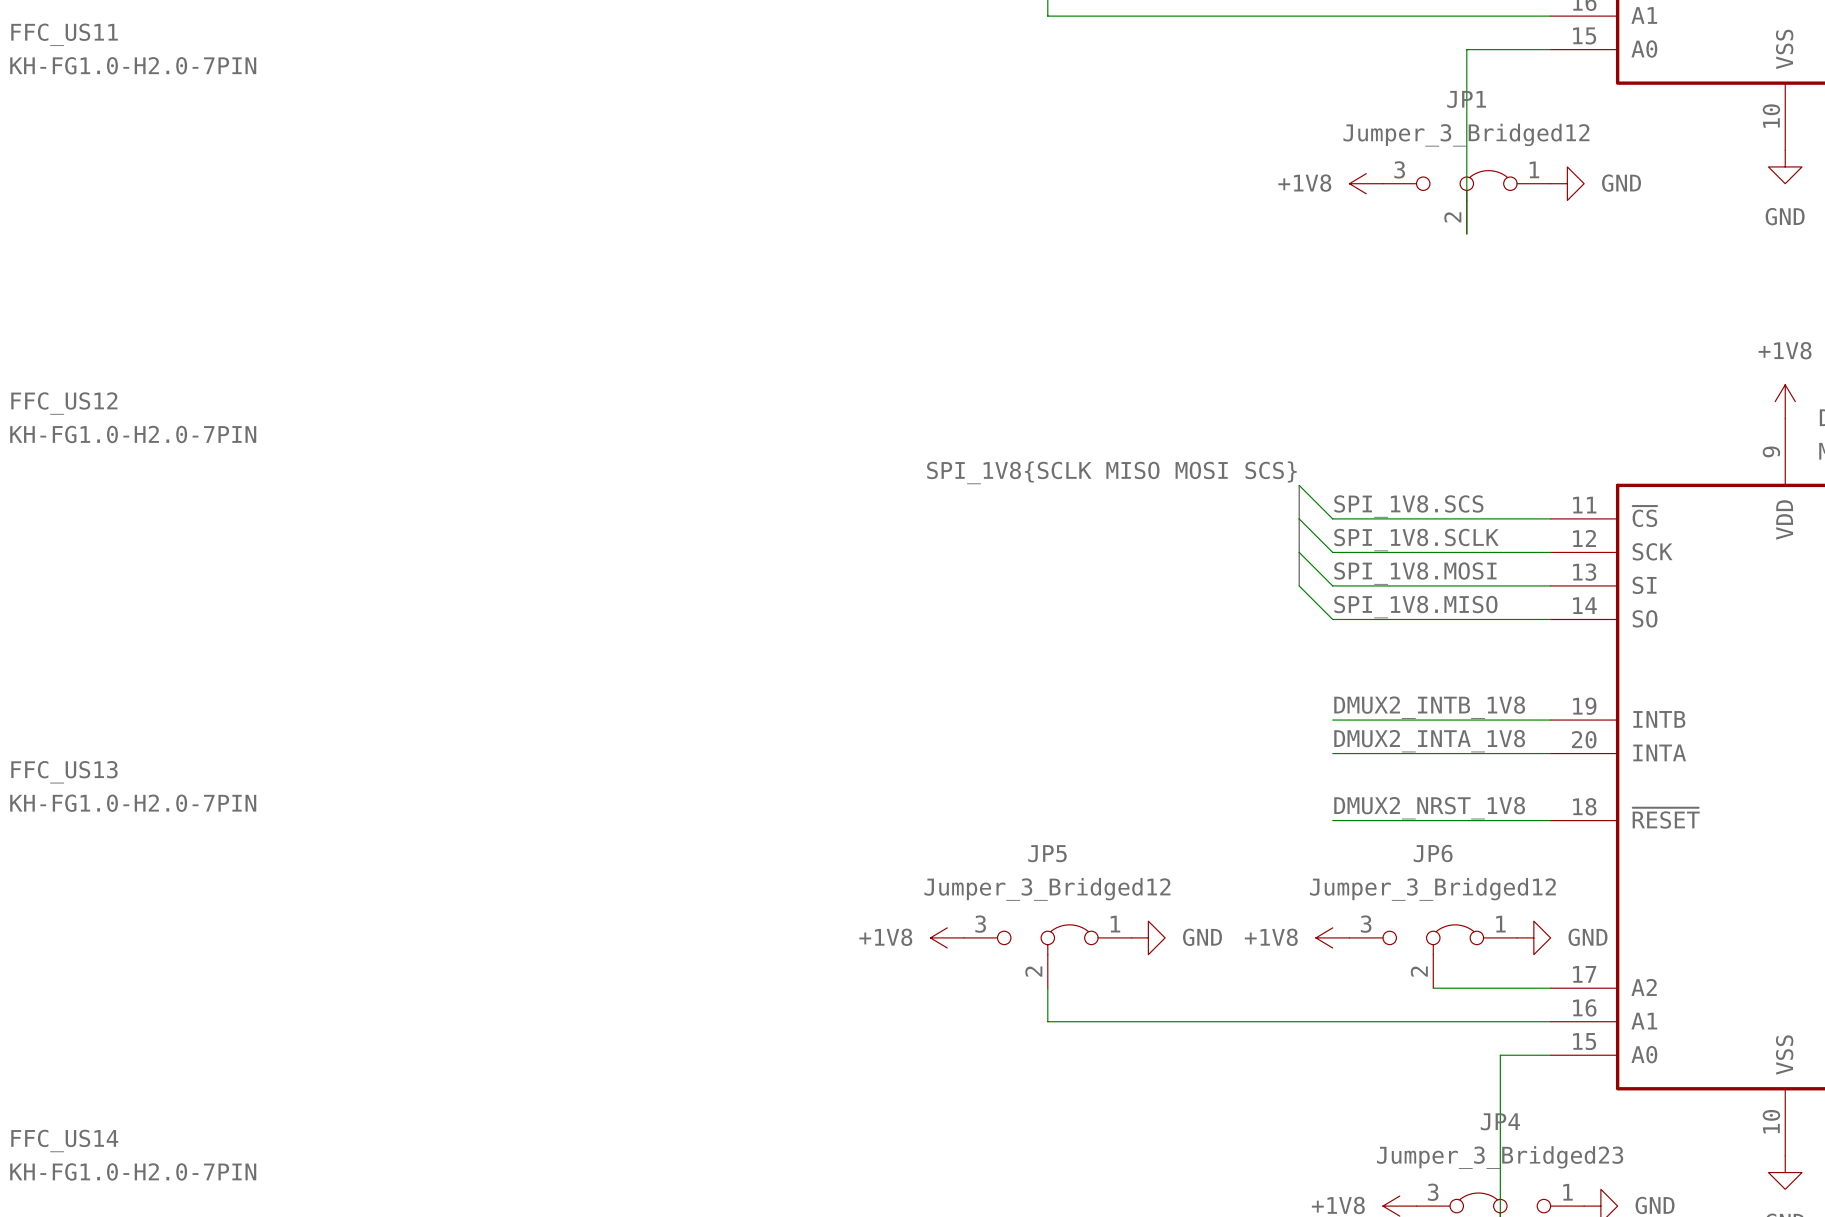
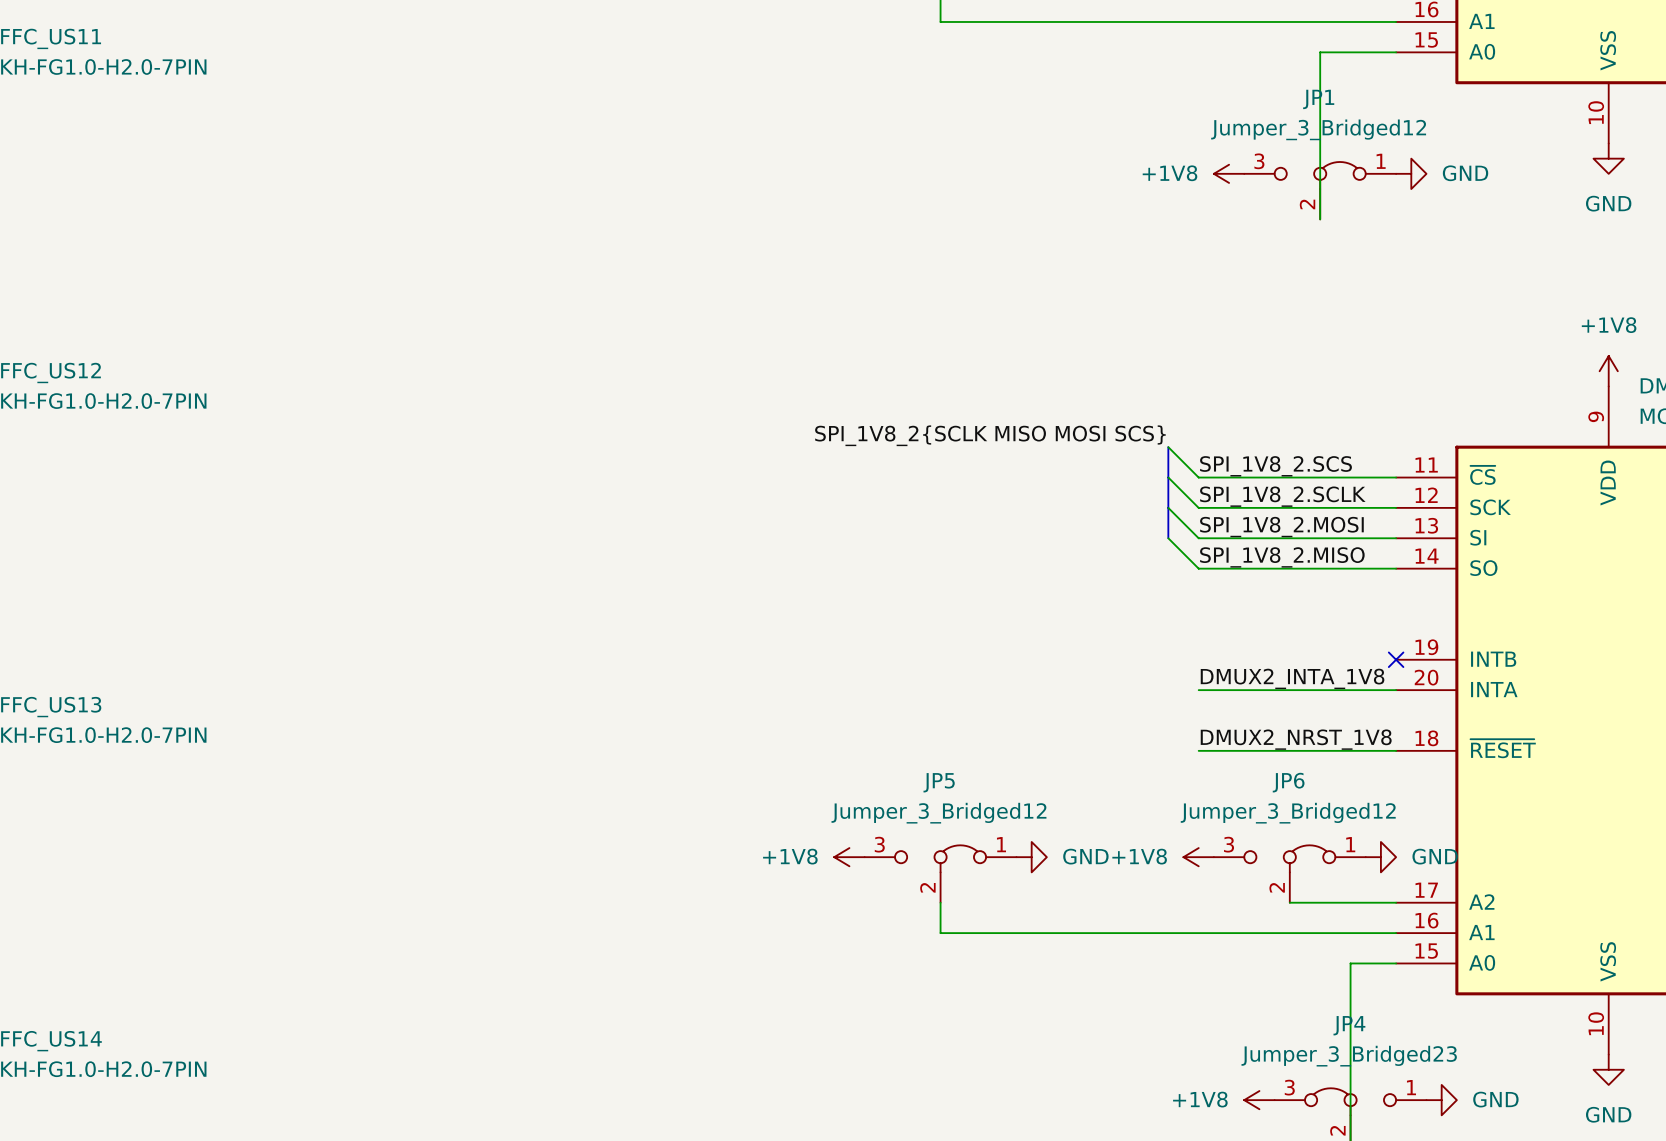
label: SPI_1V8{SCLK MISO MOSI SCS} (1111, 472) -> SPI_1V8_2{SCLK MISO MOSI SCS} (990, 435)
label: SPI_1V8.SCS (1408, 506) -> SPI_1V8_2.SCS (1275, 466)
label: SPI_1V8.SCLK (1416, 540) -> SPI_1V8_2.SCLK (1282, 496)
label: SPI_1V8.MOSI (1415, 573) -> SPI_1V8_2.MOSI (1281, 527)
label: SPI_1V8.MISO (1415, 607) -> SPI_1V8_2.MISO (1282, 557)
label: DMUX2_INTB_1V8 (1429, 707) -> none
wire: (1332, 720) (1550, 720) -> none
no-connect mark: none -> (1396, 659)

